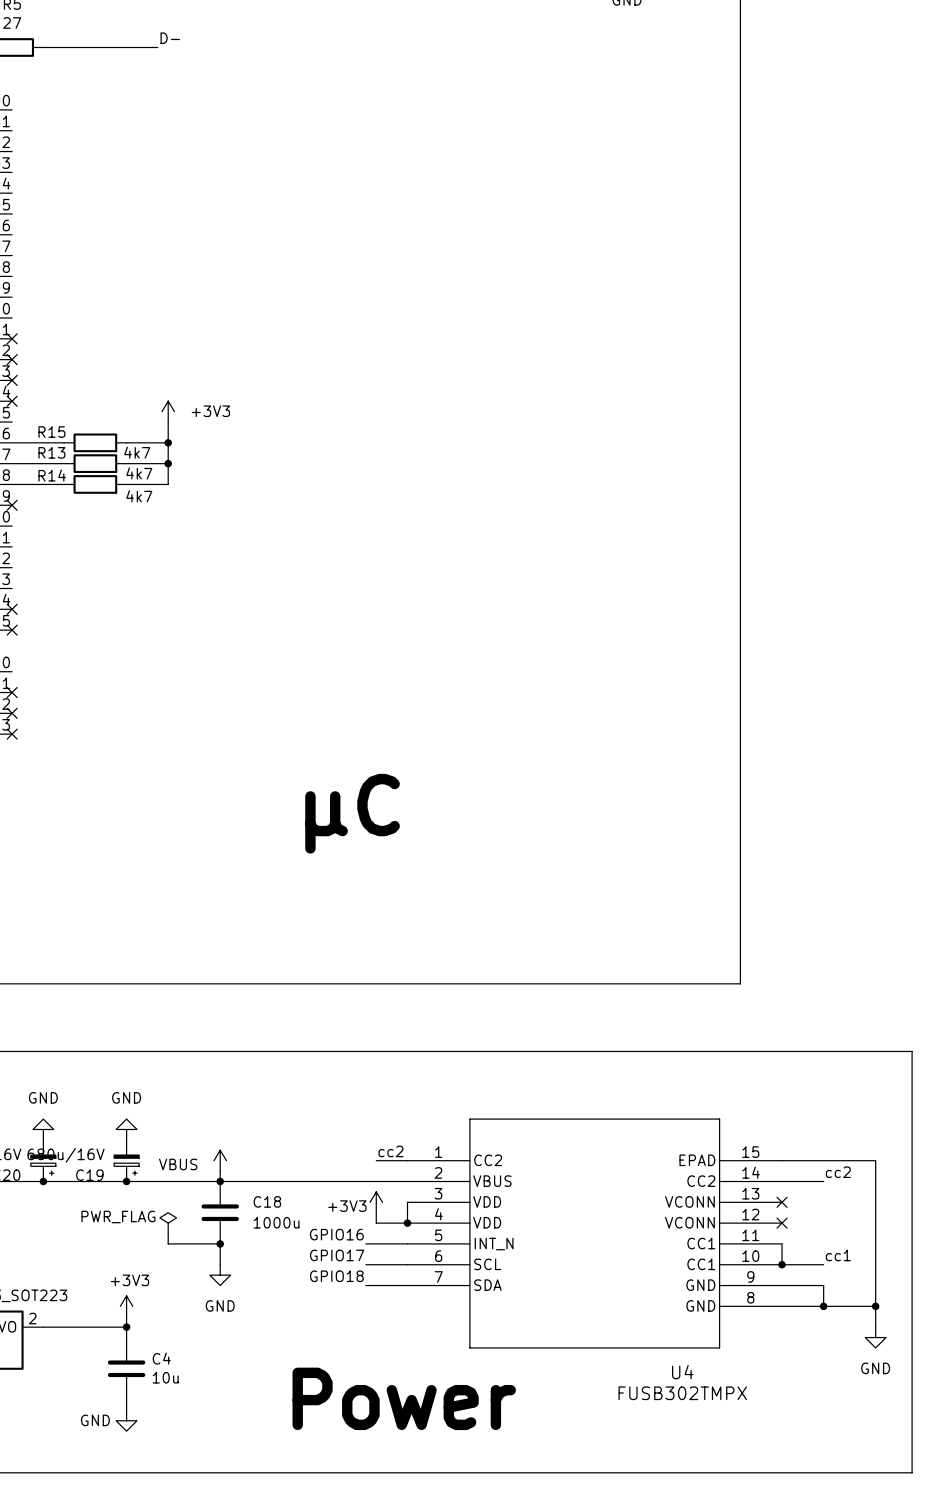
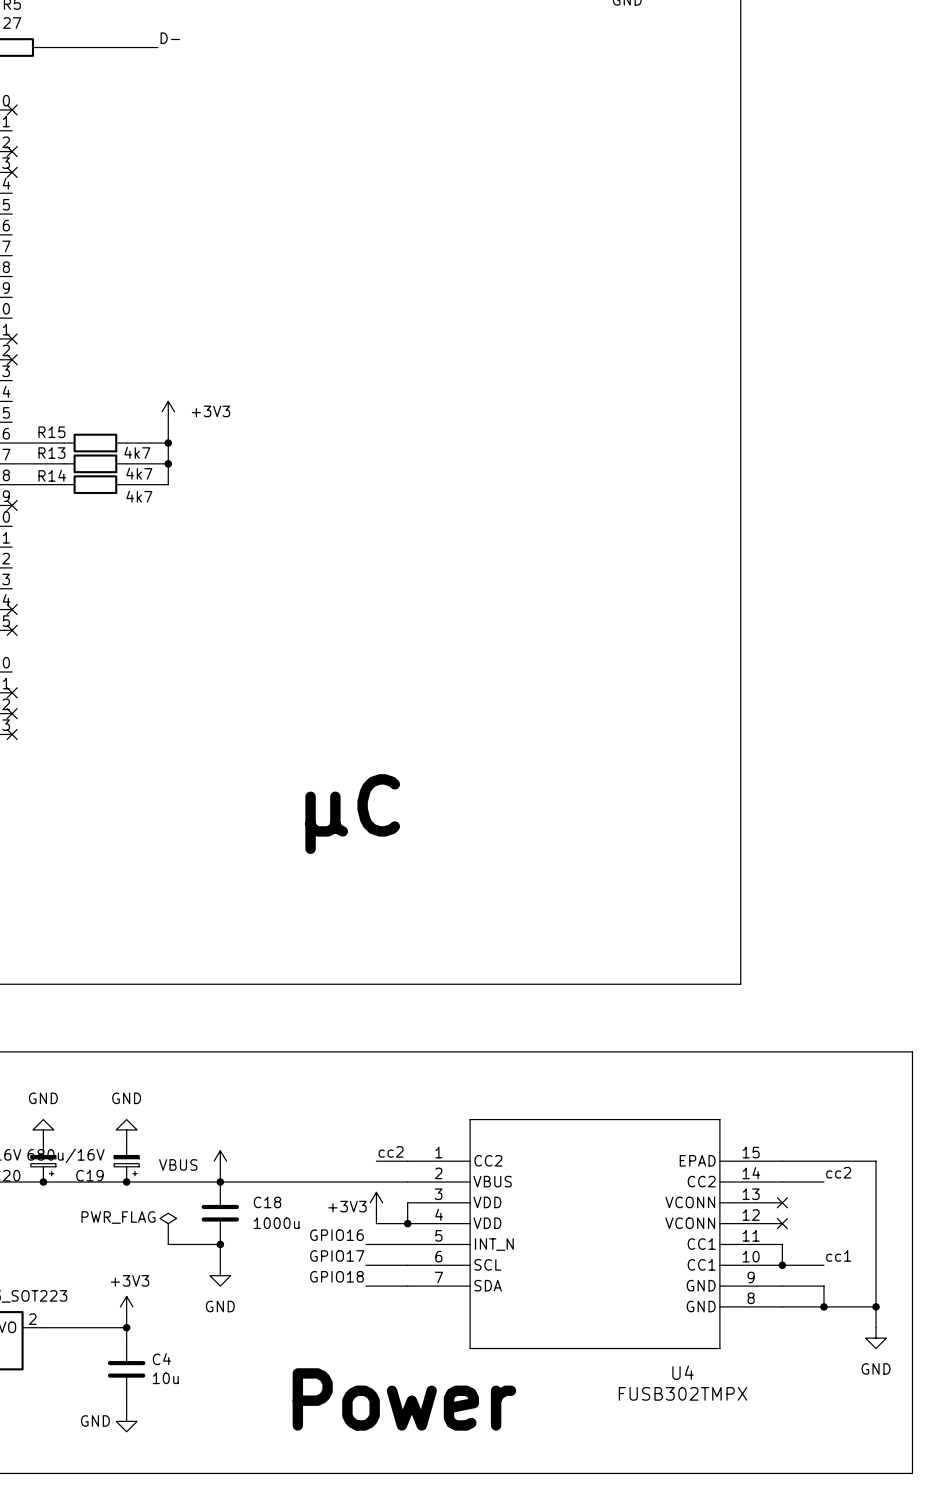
no-connect mark: none -> (12, 109)
no-connect mark: none -> (12, 151)
no-connect mark: none -> (12, 172)
no-connect mark: (12, 380) -> none
no-connect mark: (12, 401) -> none

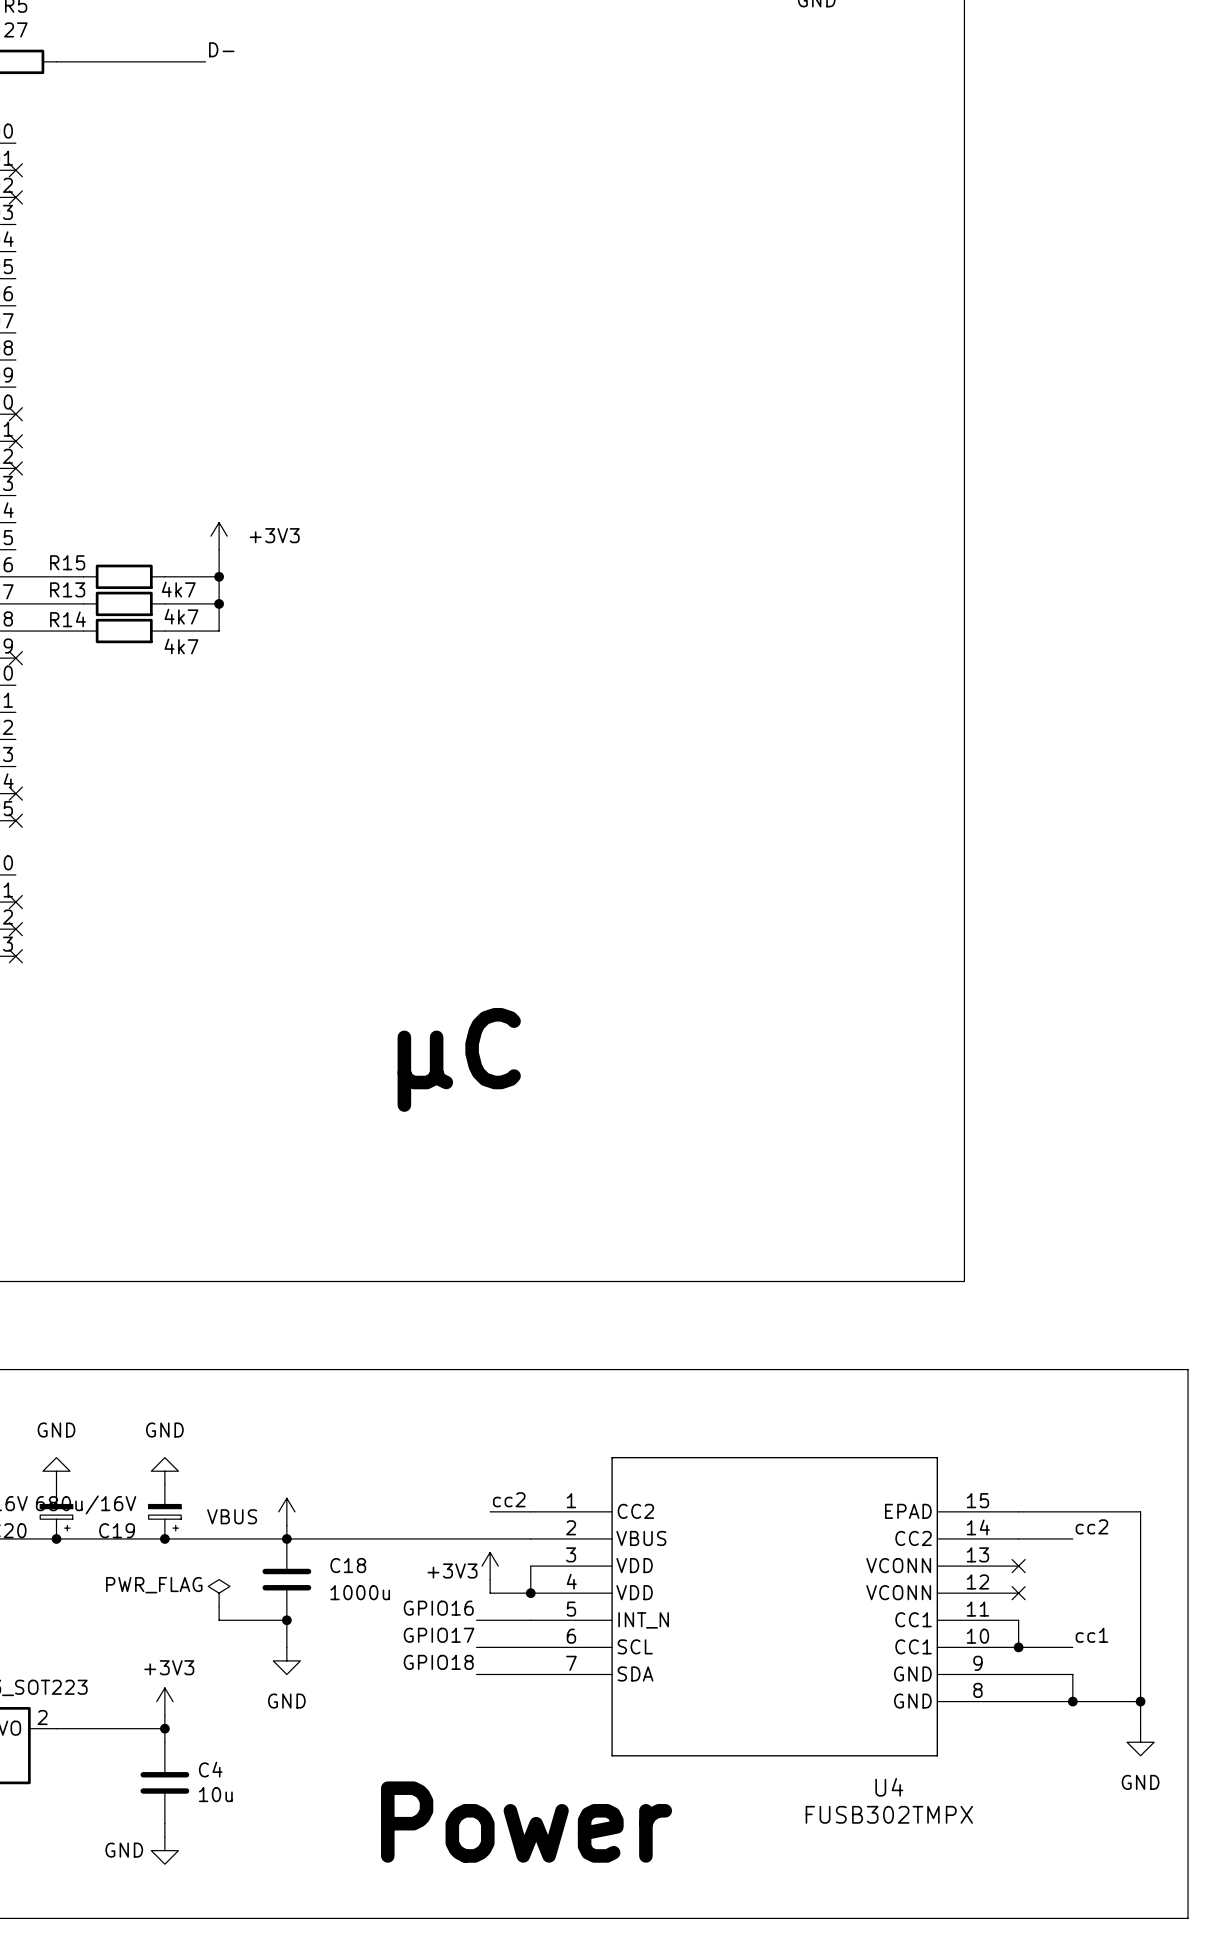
no-connect mark: (12, 109) -> none
no-connect mark: none -> (15, 170)
no-connect mark: (12, 172) -> none
no-connect mark: none -> (15, 414)

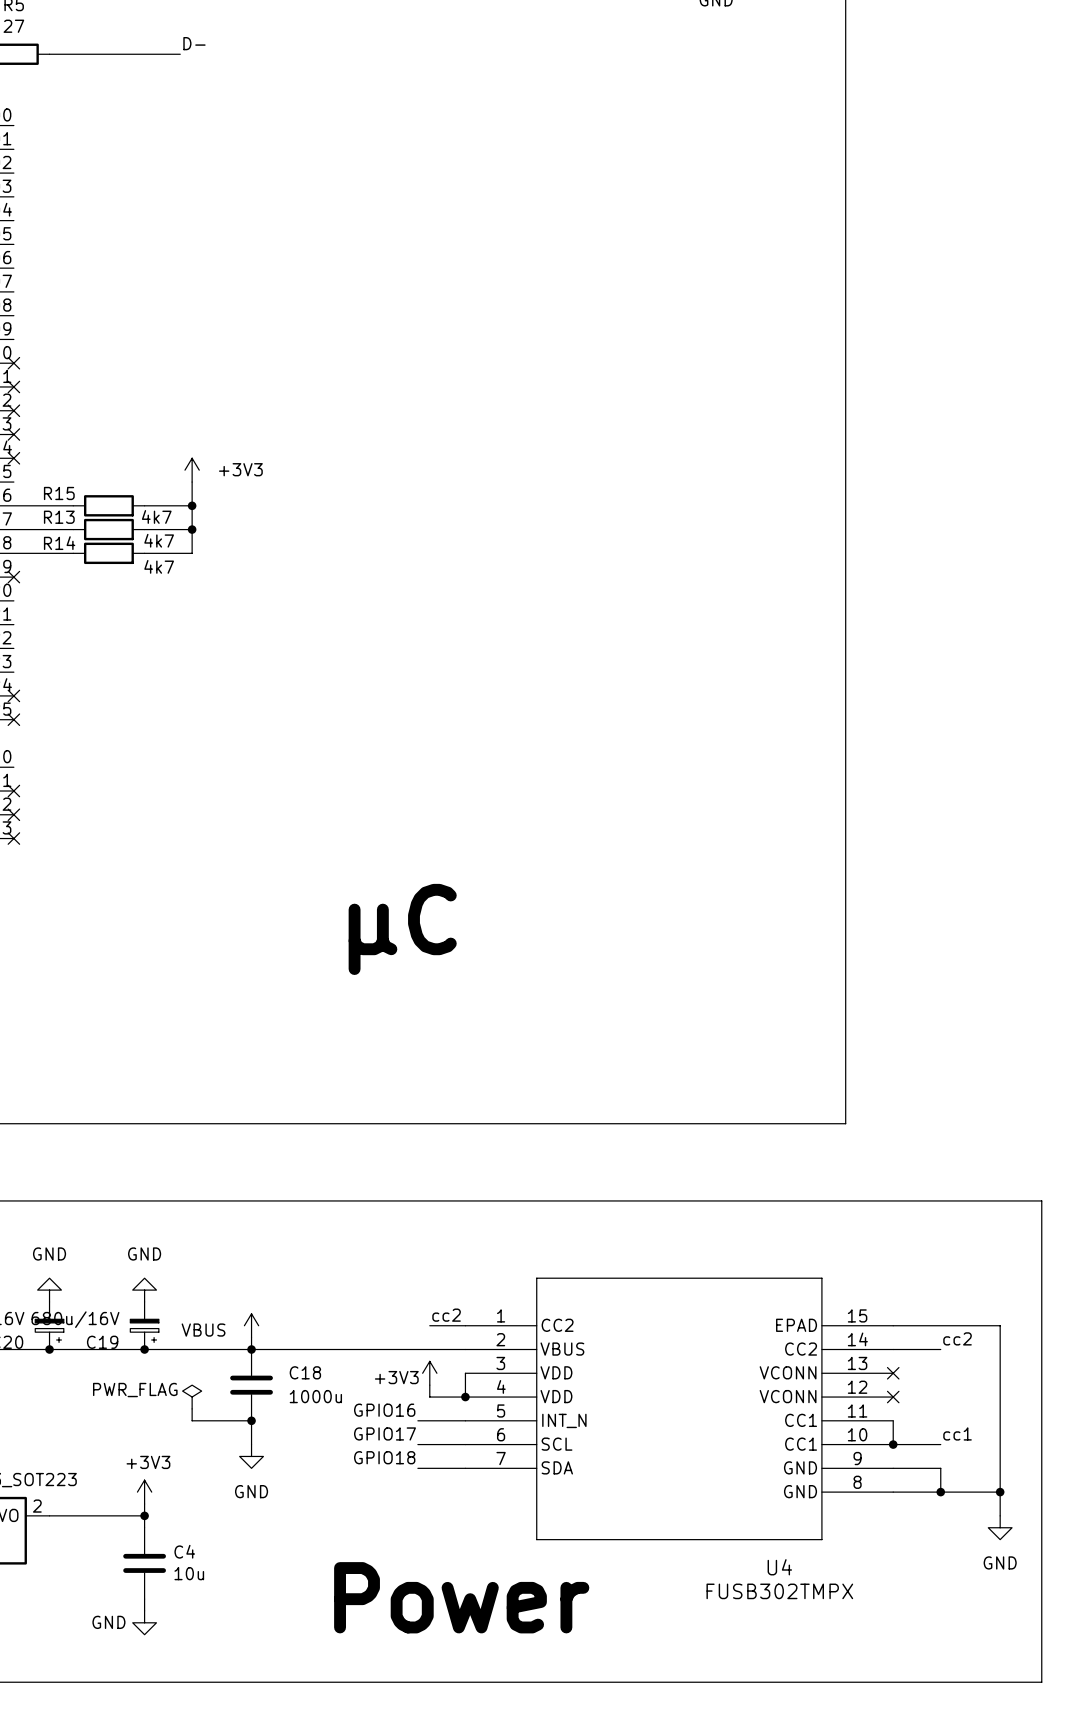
no-connect mark: (15, 170) -> none
no-connect mark: (15, 197) -> none
no-connect mark: none -> (13, 434)
no-connect mark: none -> (13, 458)

